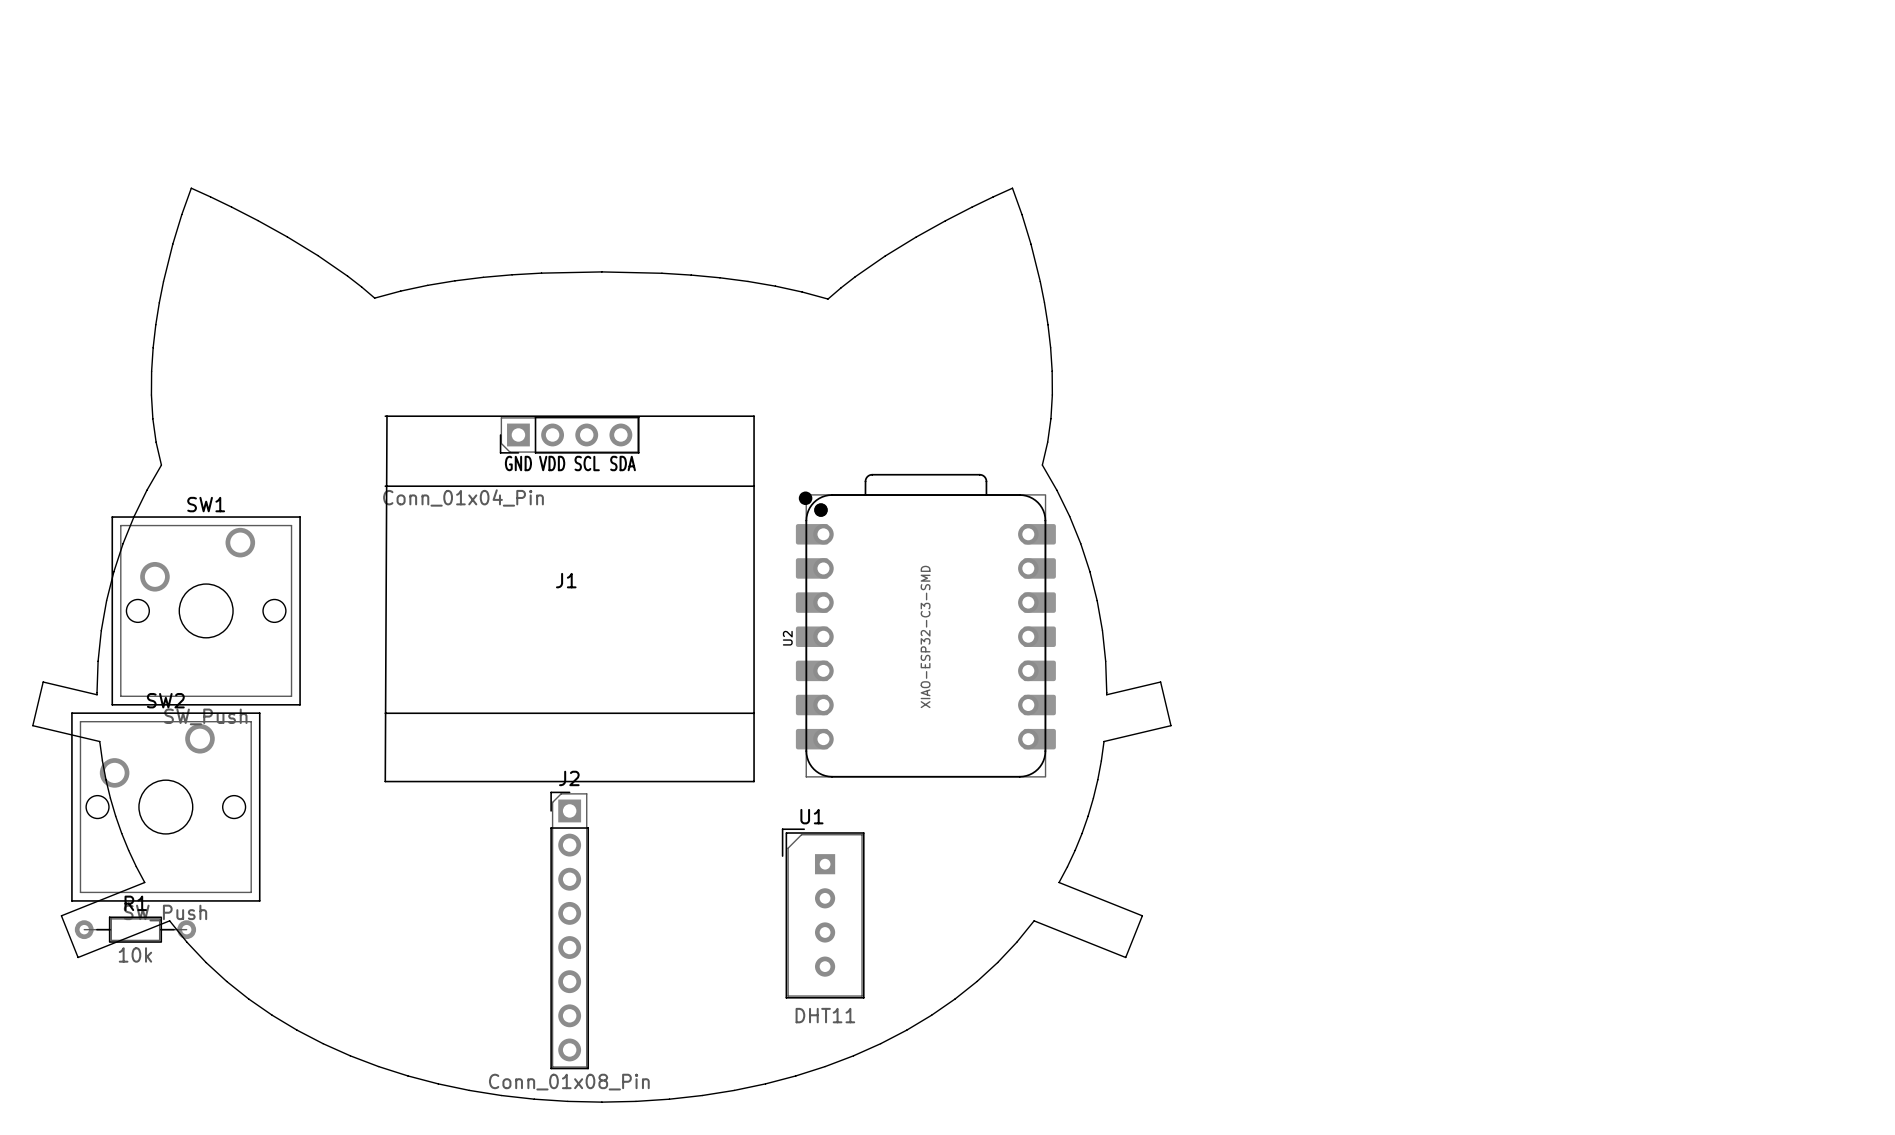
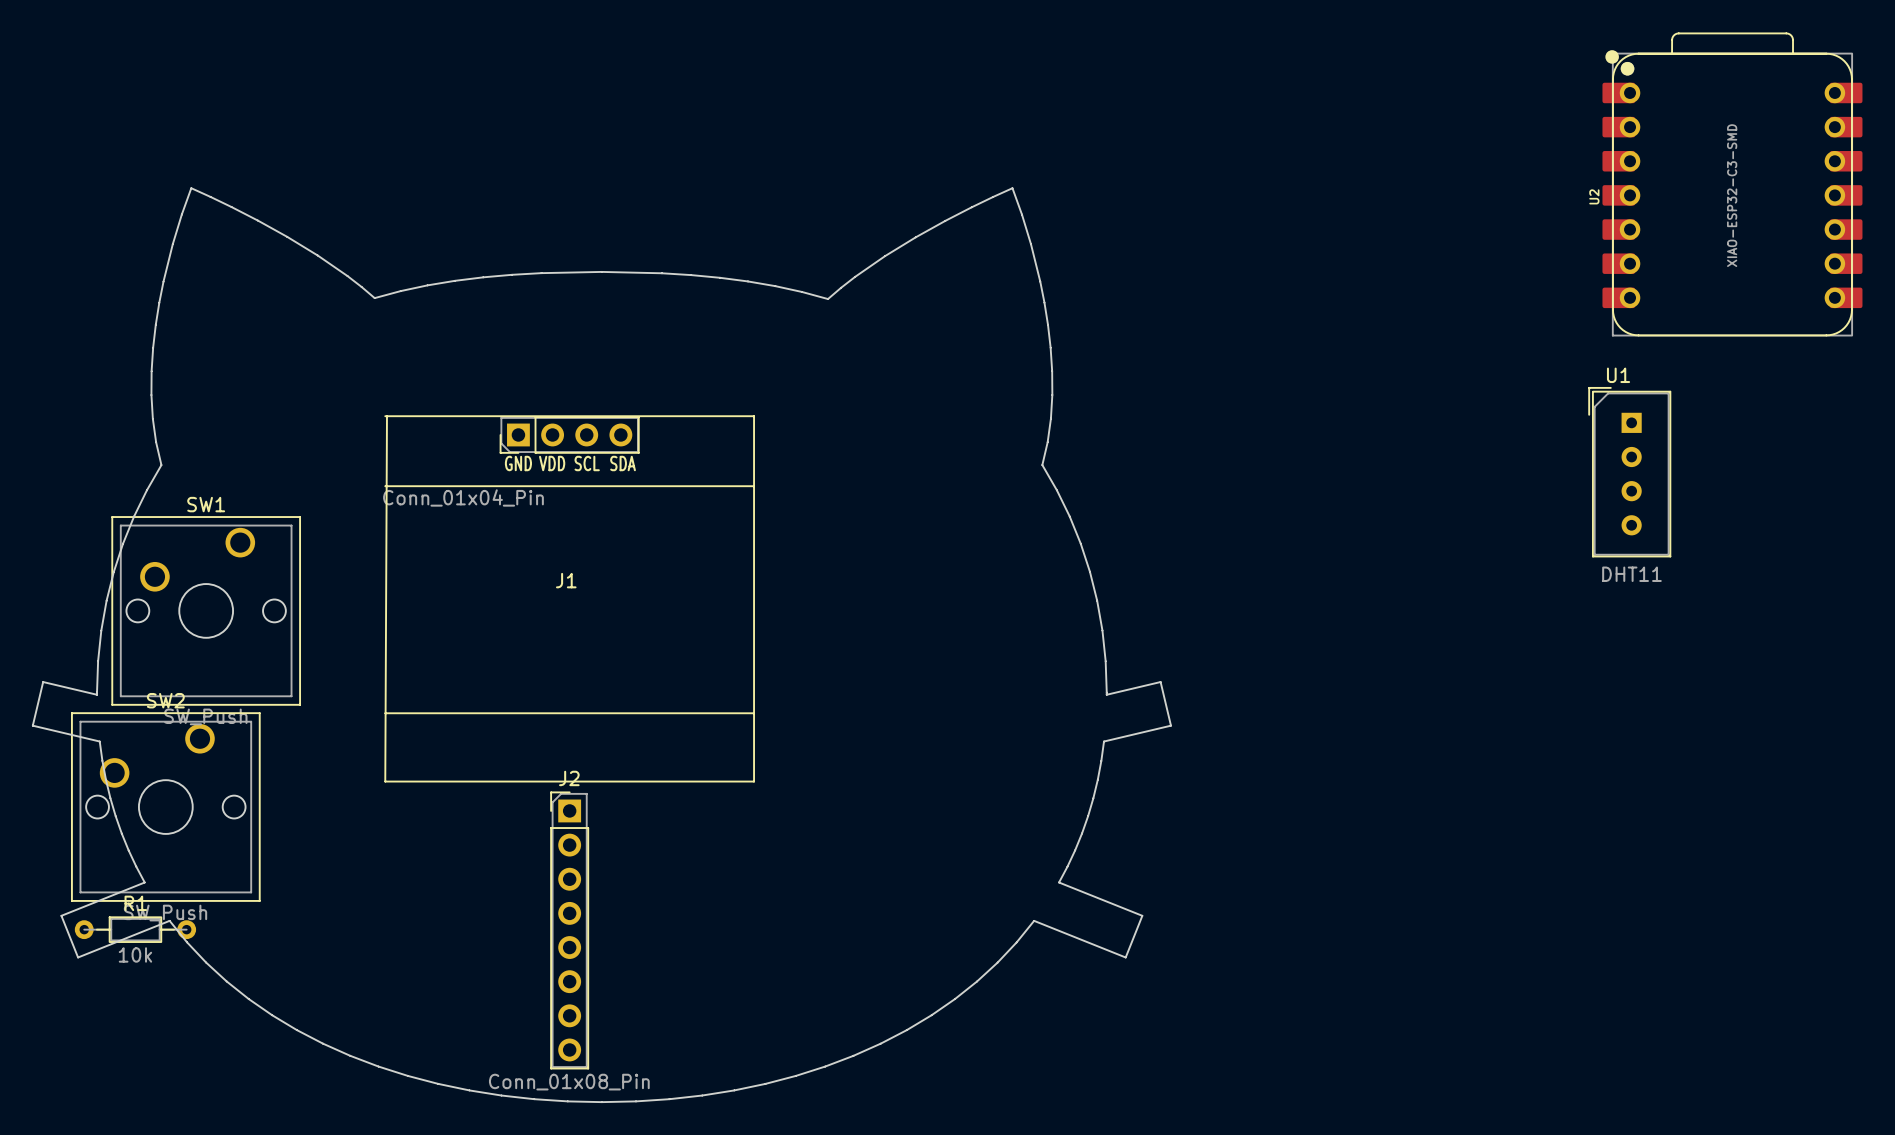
U2 position: (925, 625) -> (1732, 184)
U1 position: (823, 913) -> (1629, 472)

